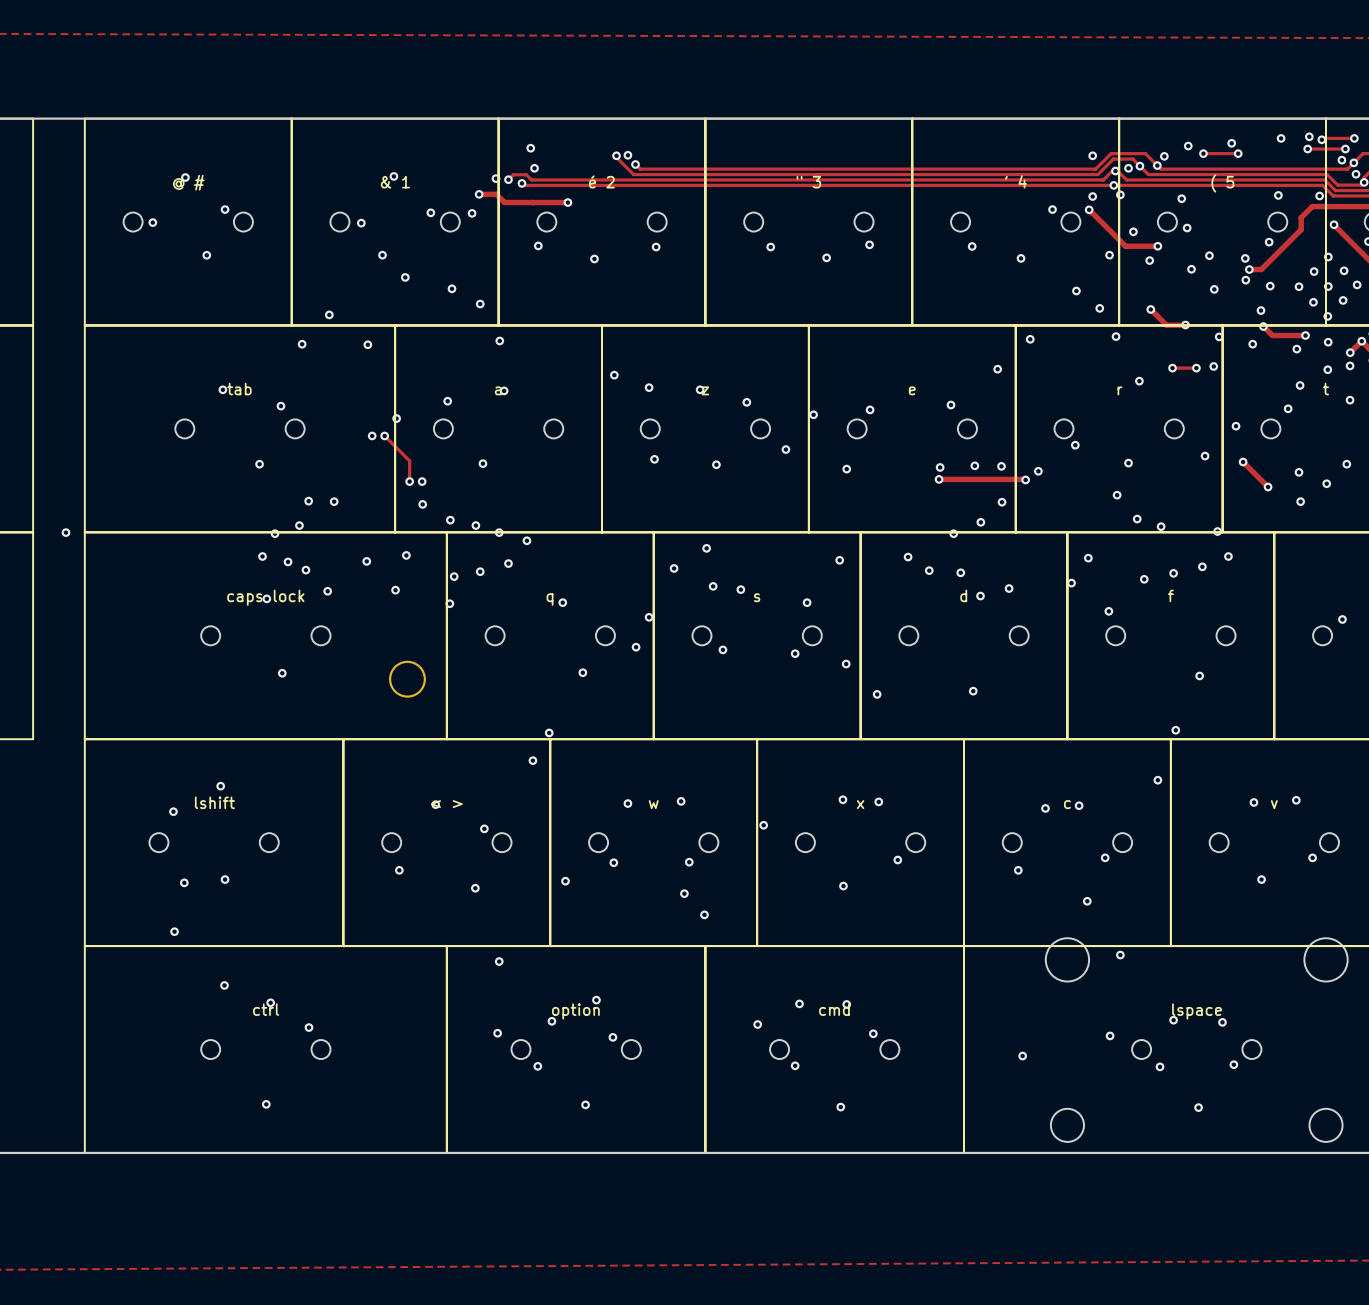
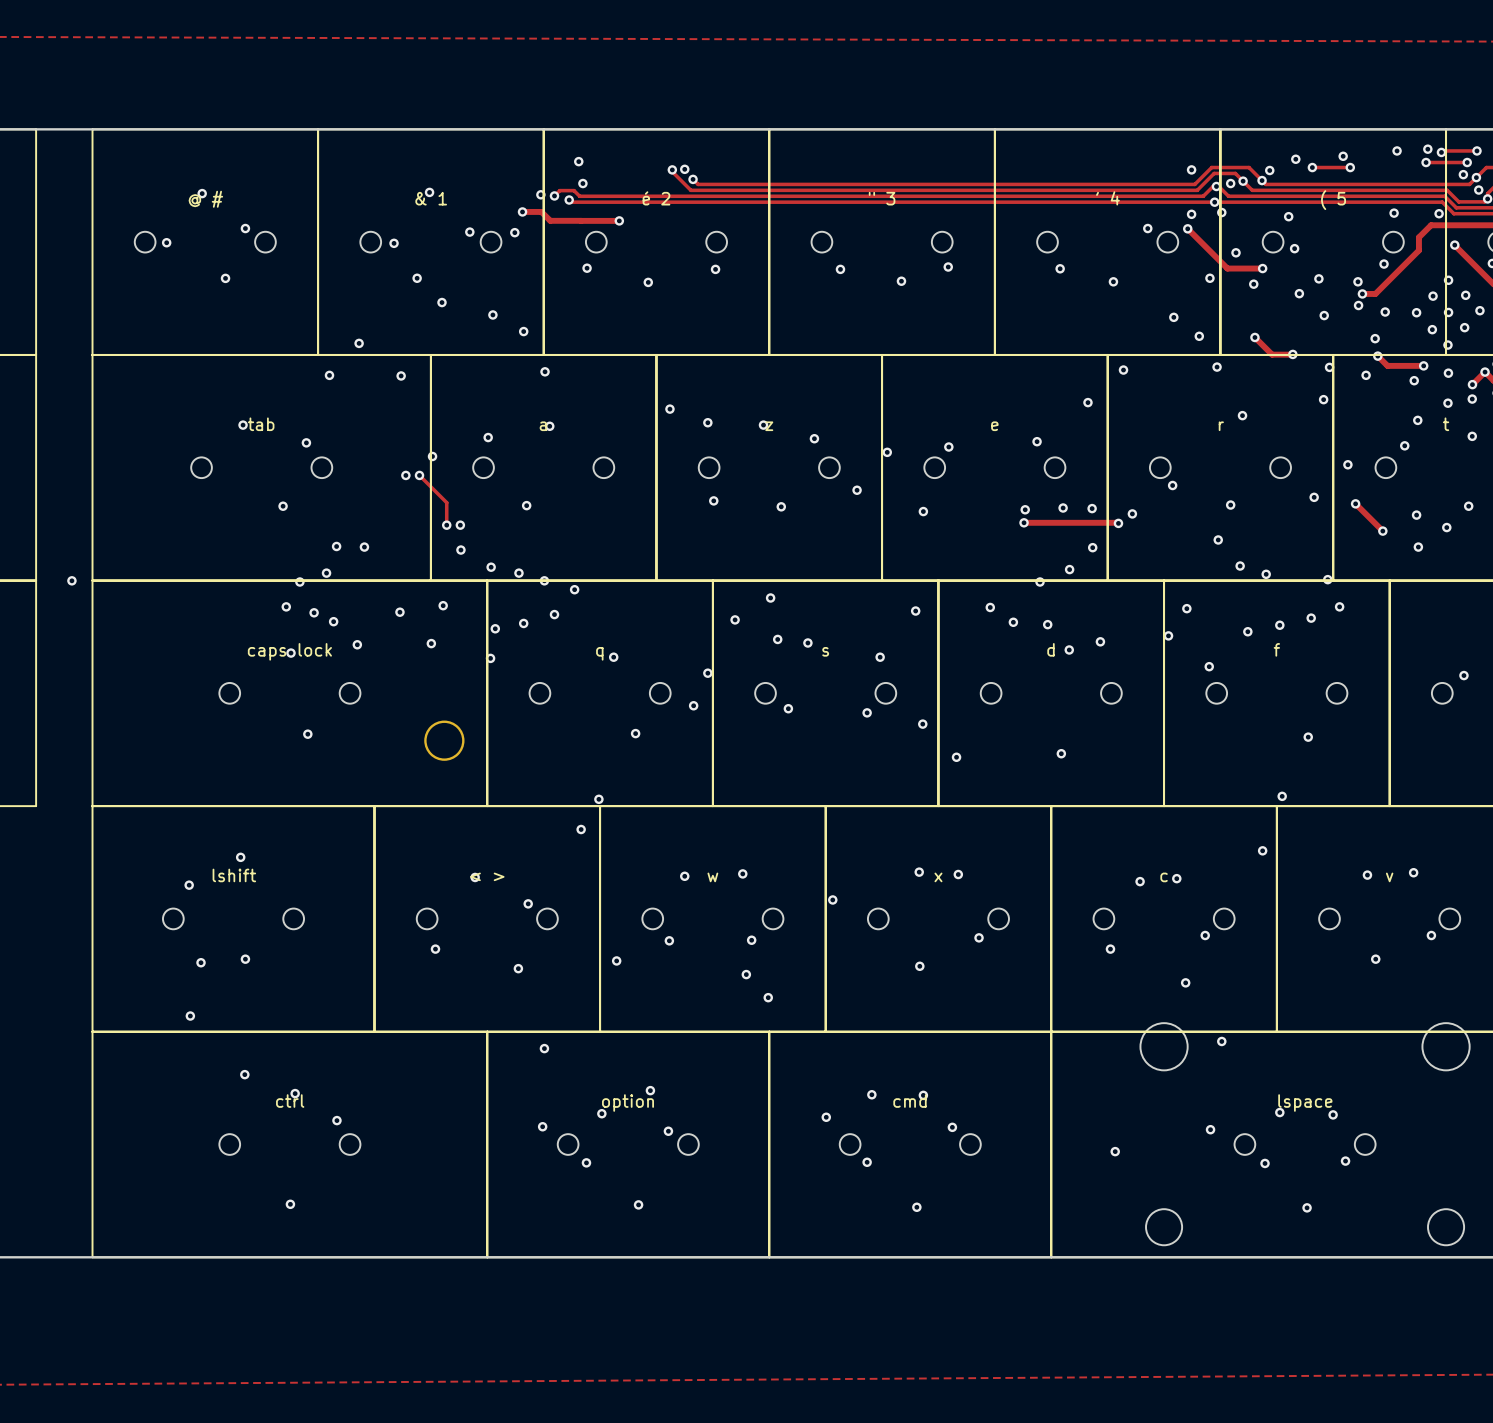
track: (1172, 368) (1196, 368) -> none
via: (1172, 368) -> none
via: (1196, 368) -> none

